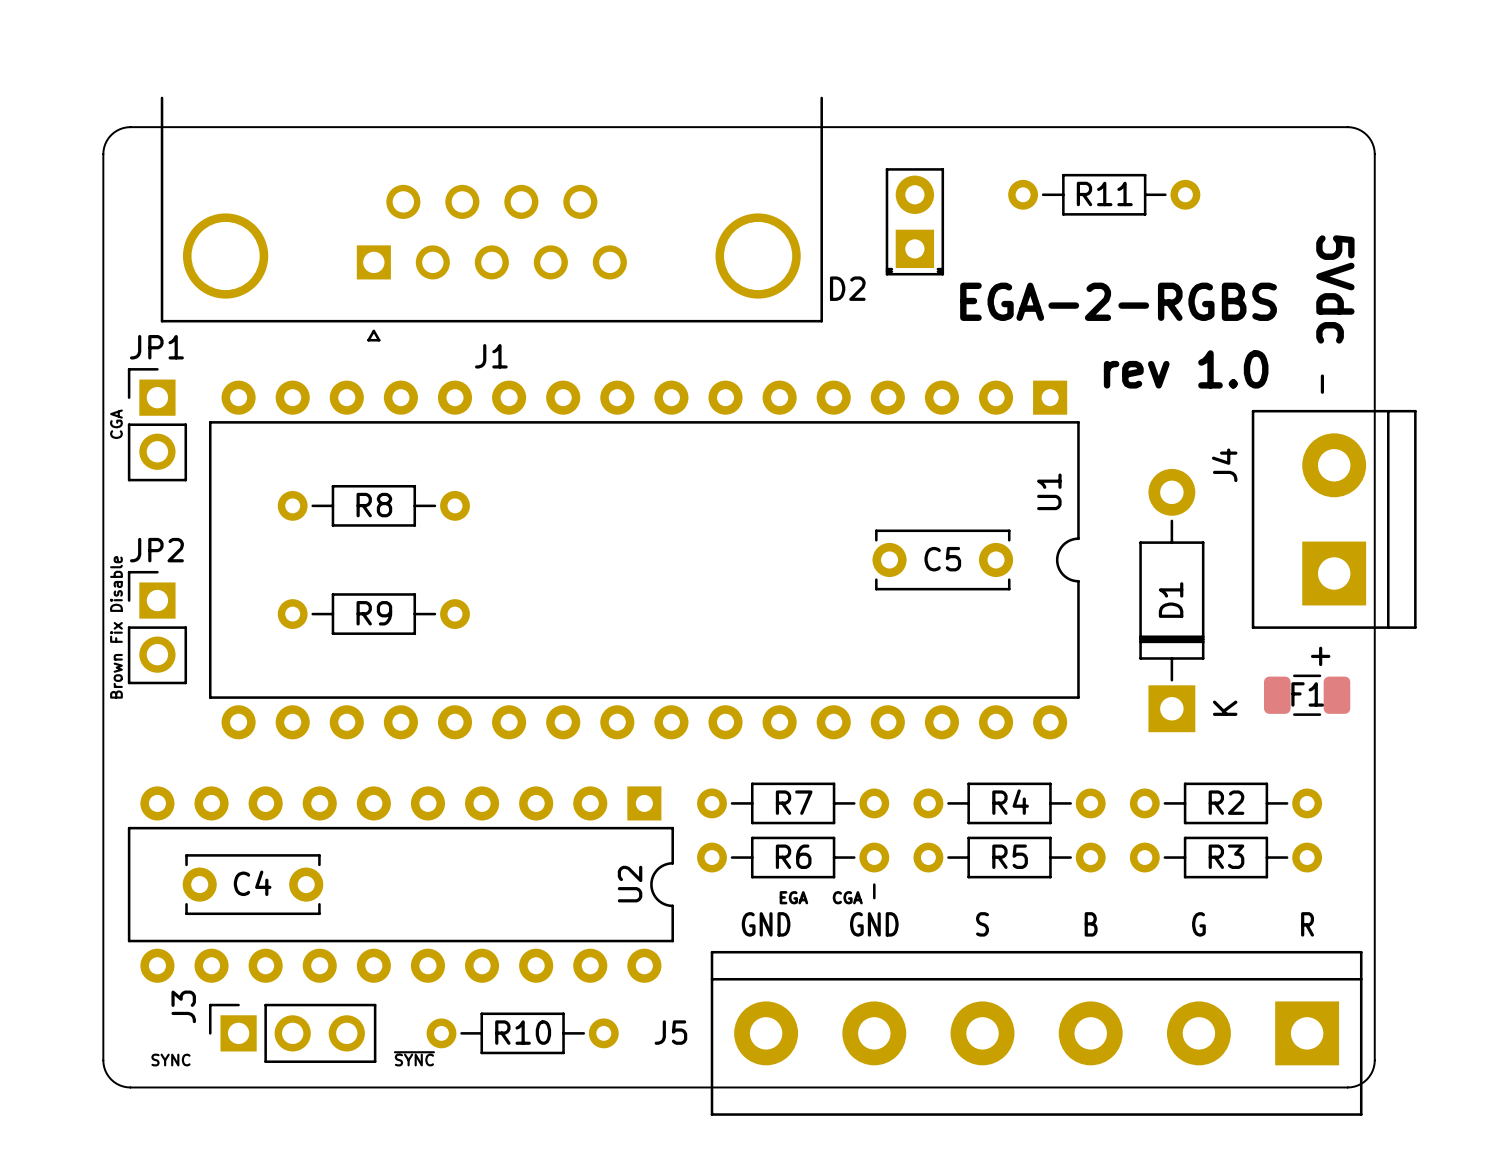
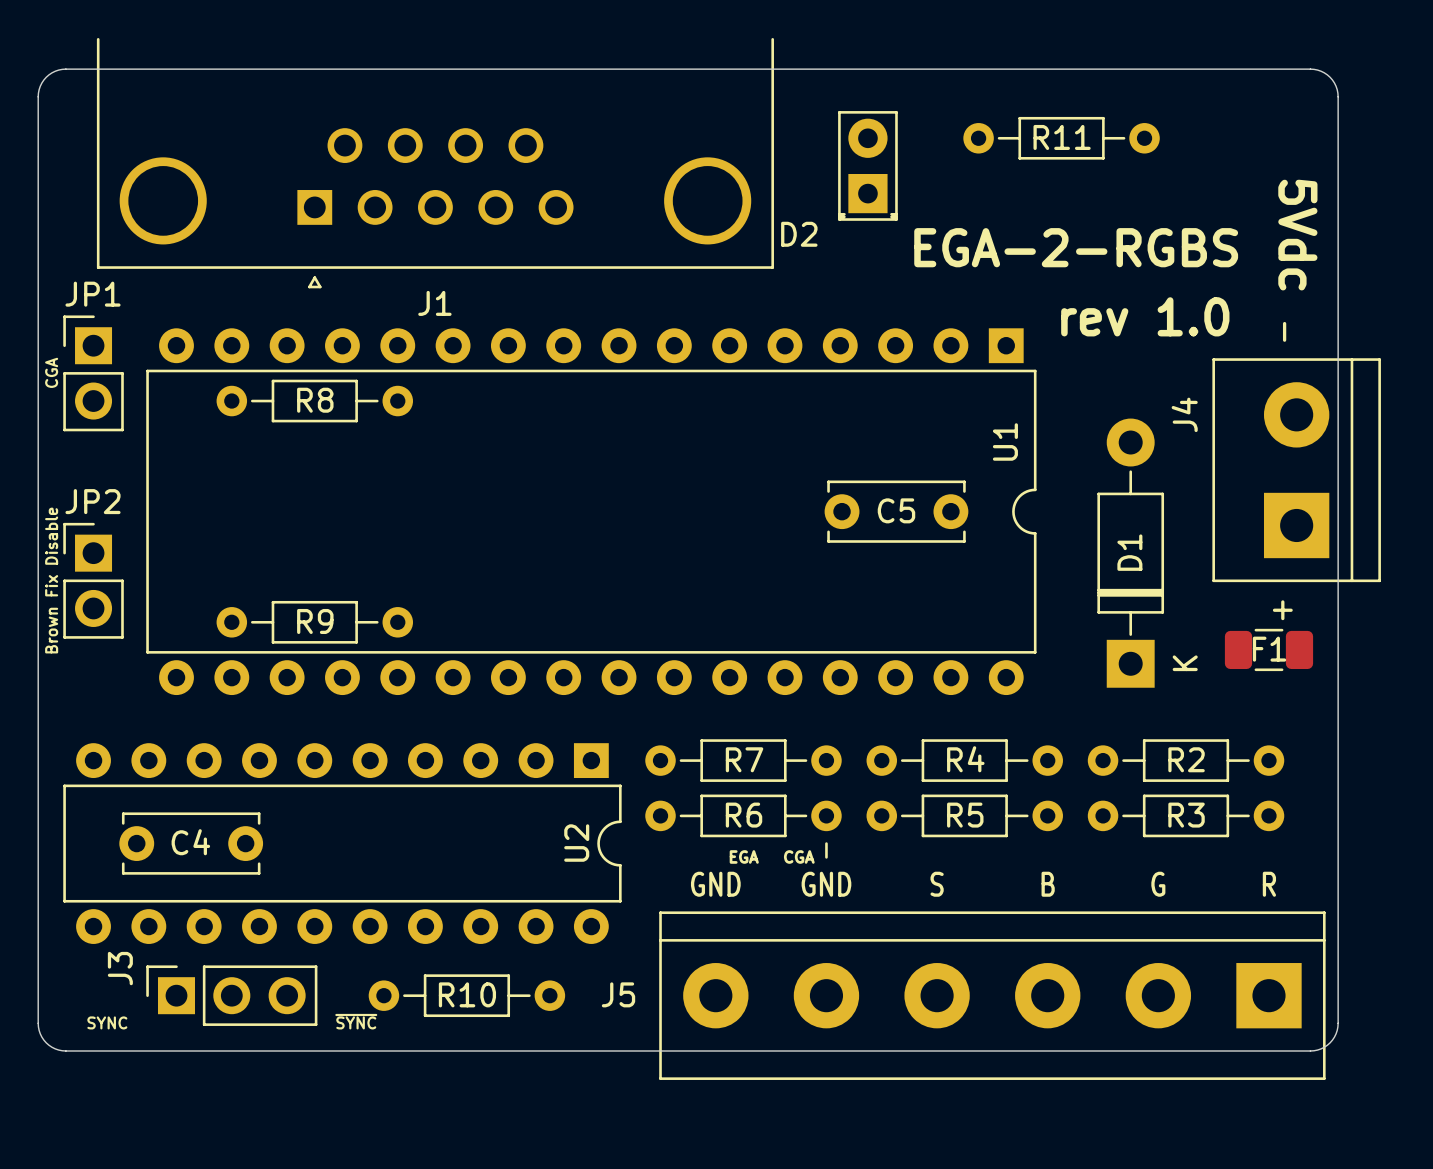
R8 position: (373, 505) -> (314, 401)
R9 position: (373, 614) -> (314, 622)

